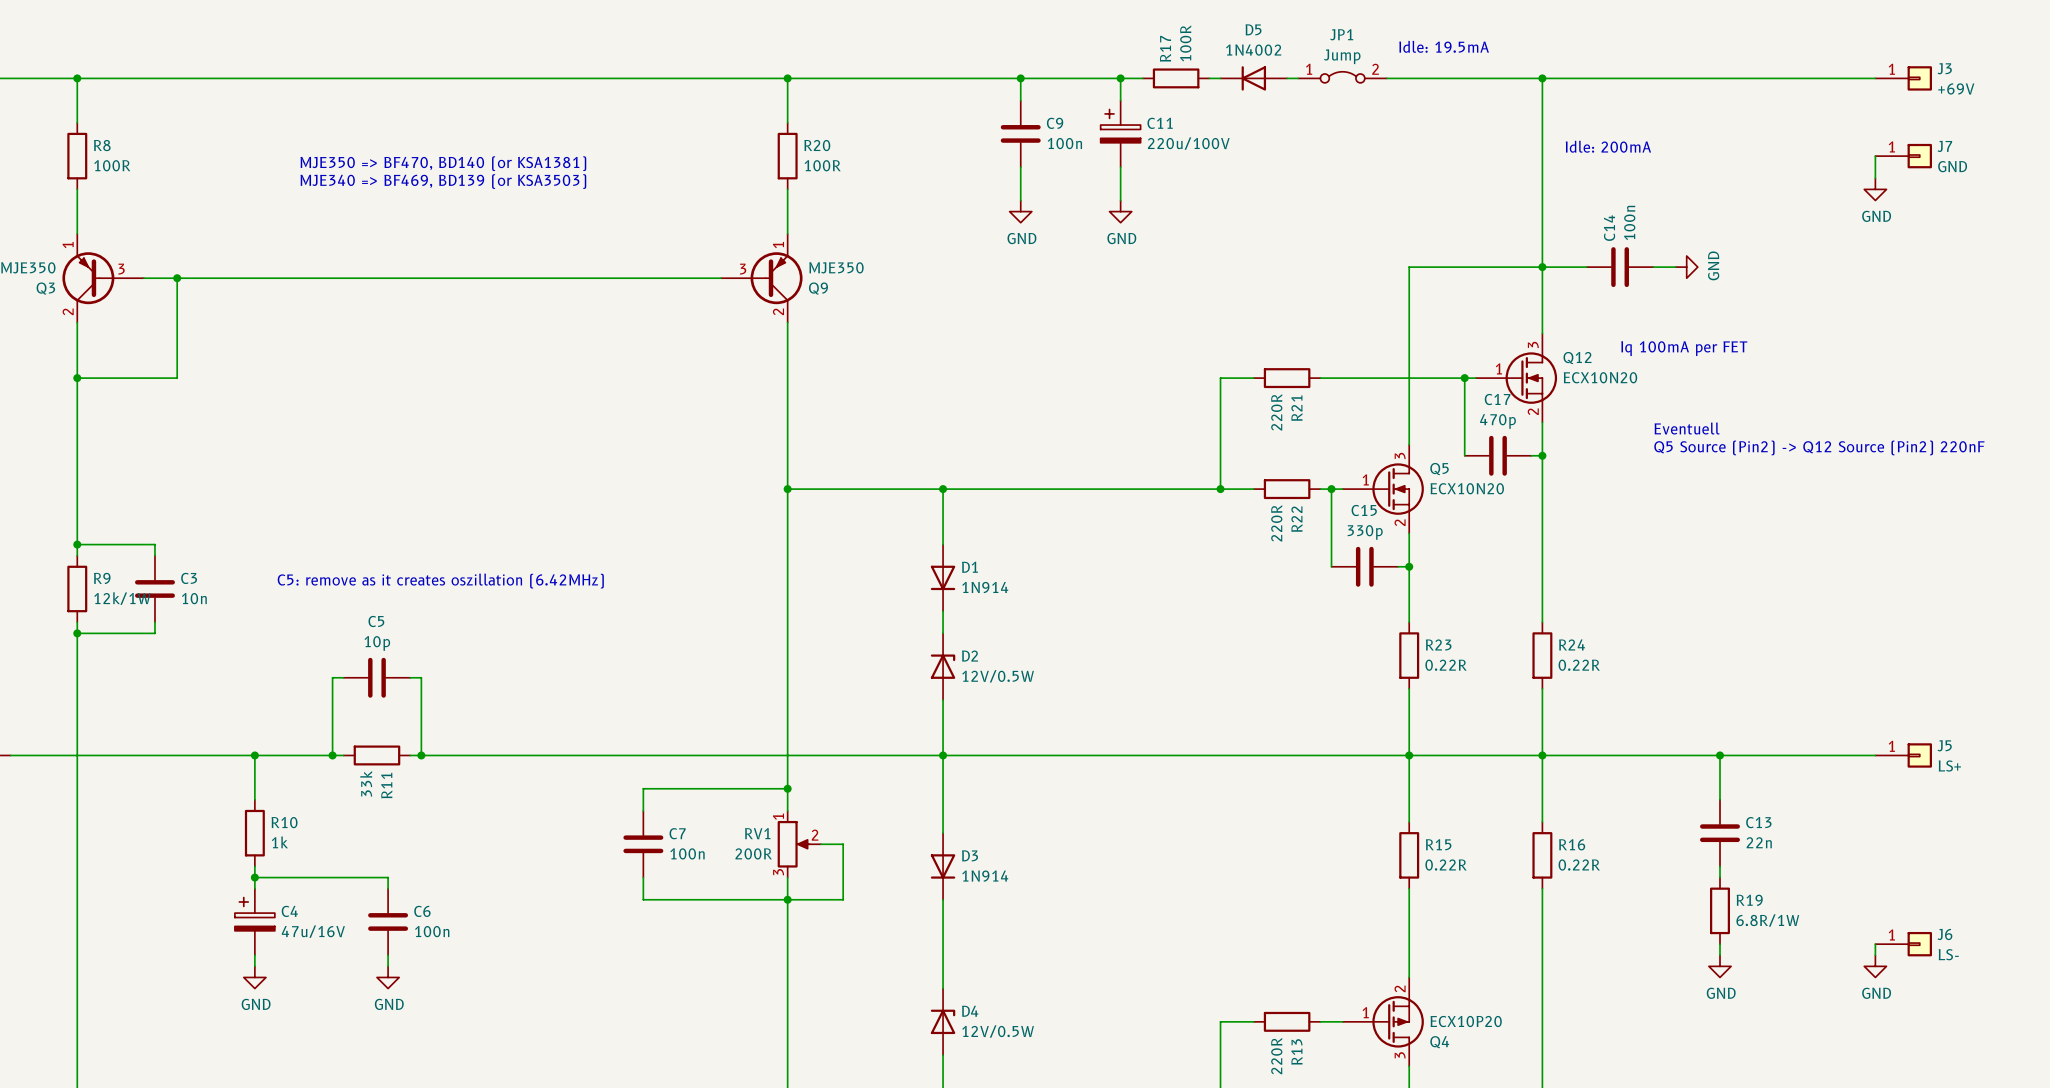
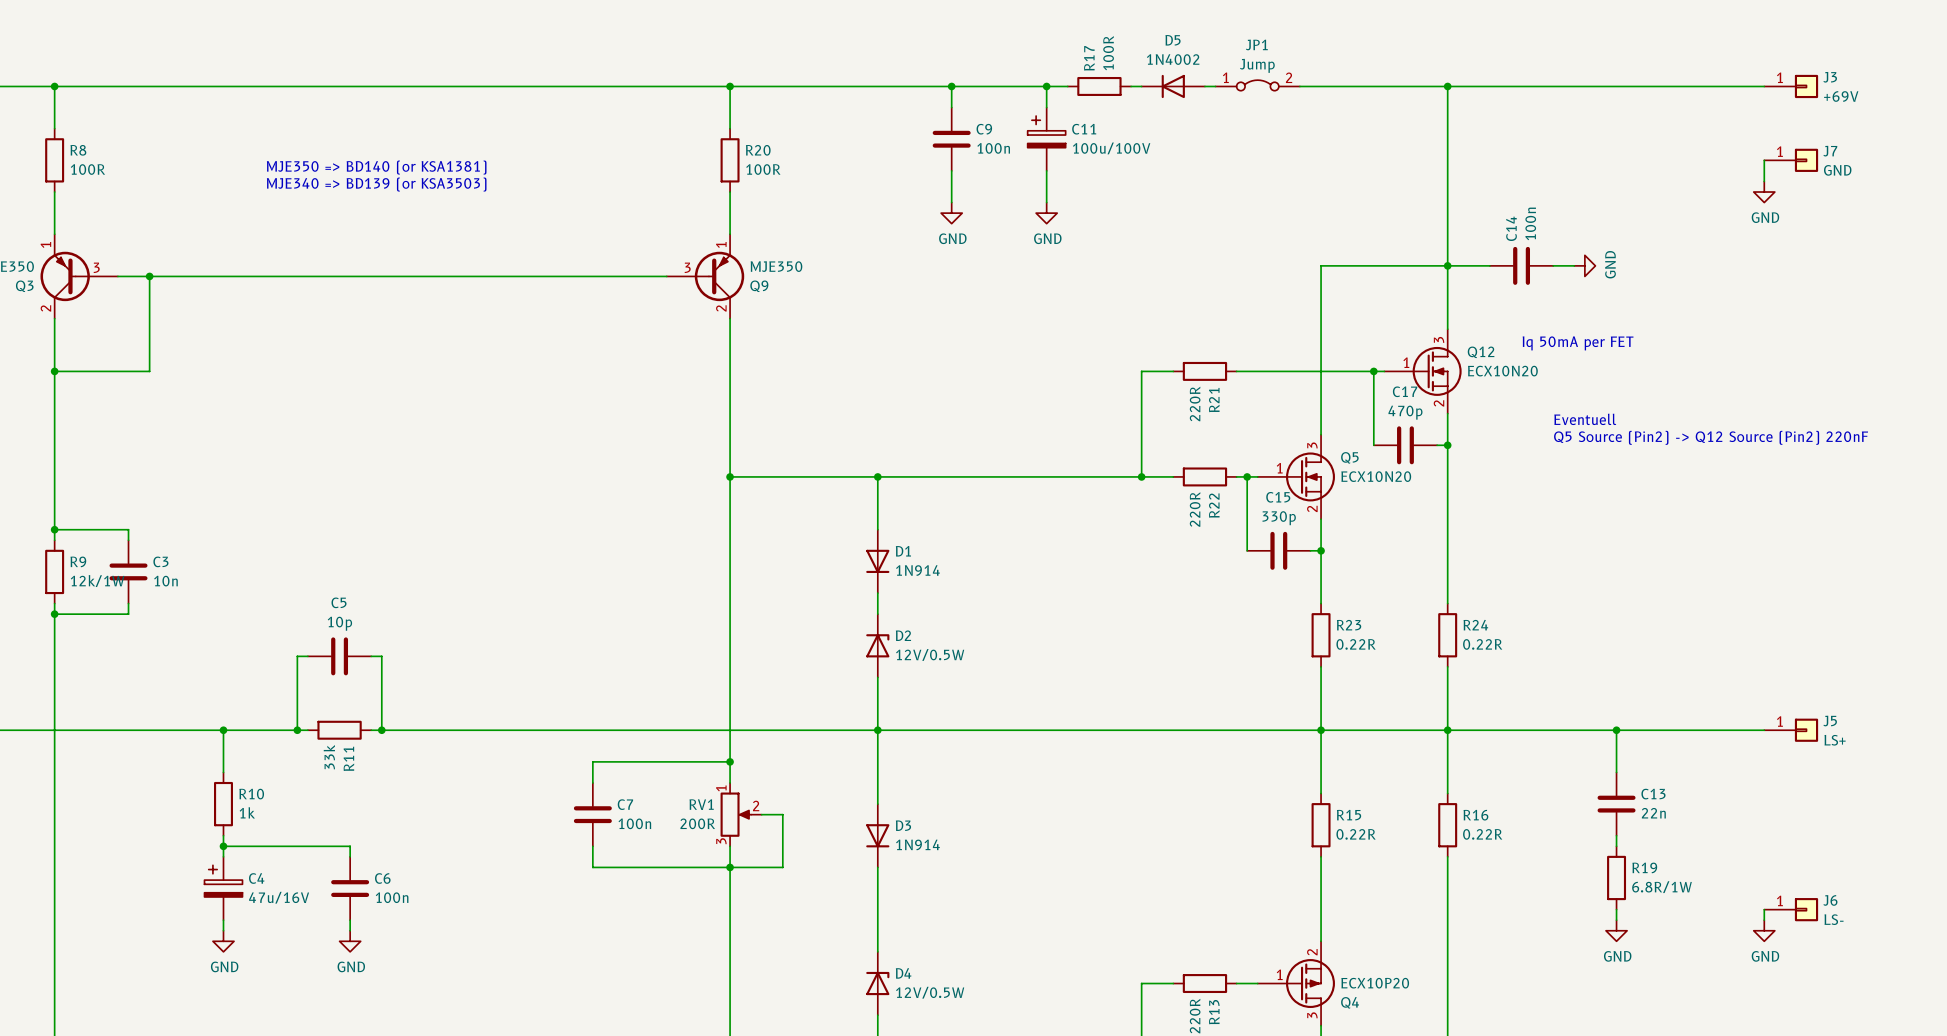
text: Idle: 19.5mA (1444, 46) -> none
C11 value: 220u/100V (1188, 143) -> 100u/100V (1111, 148)
text: Idle: 200mA (1608, 146) -> none
text: MJE350 => BF470, BD140 (or KSA1381) (443, 163) -> MJE350 => BD140 (or KSA1381) (376, 167)
text: MJE340 => BF469, BD139 (or KSA3503) (443, 181) -> MJE340 => BD139 (or KSA3503) (376, 184)
text: Iq 100mA per FET (1684, 348) -> Iq 50mA per FET (1578, 343)
text: C5: remove as it creates oszillation (6.42MHz) (440, 581) -> none

